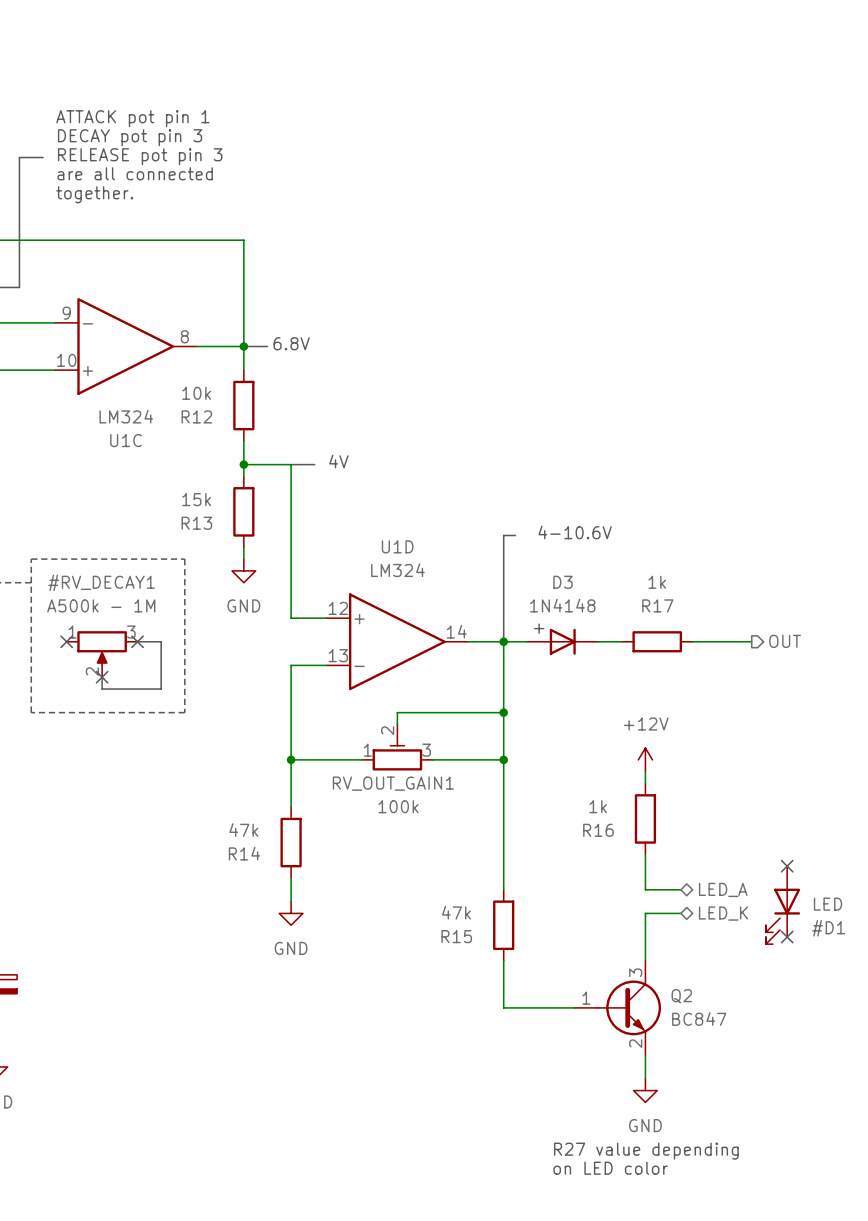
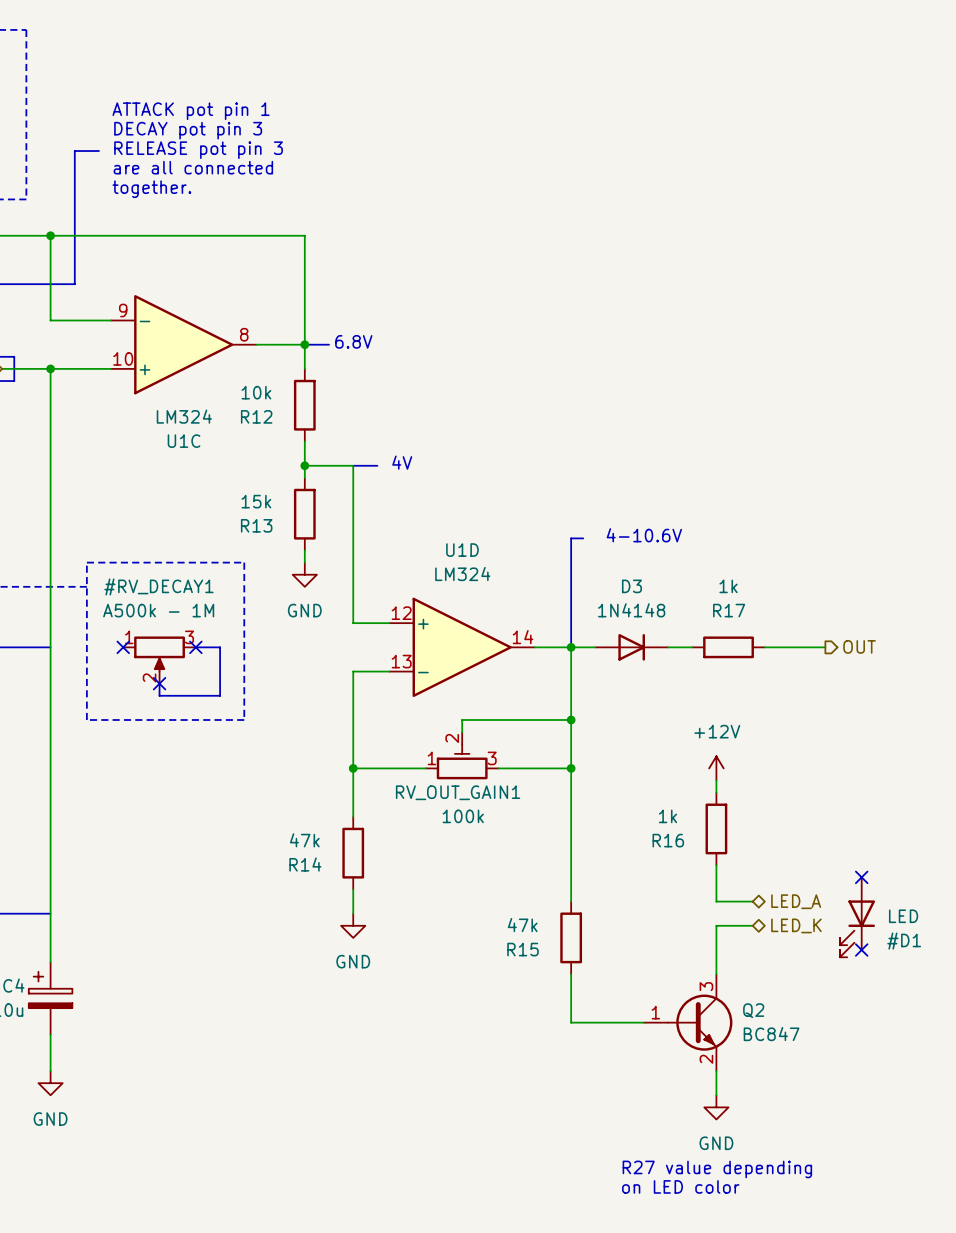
text: + (539, 628) -> none

